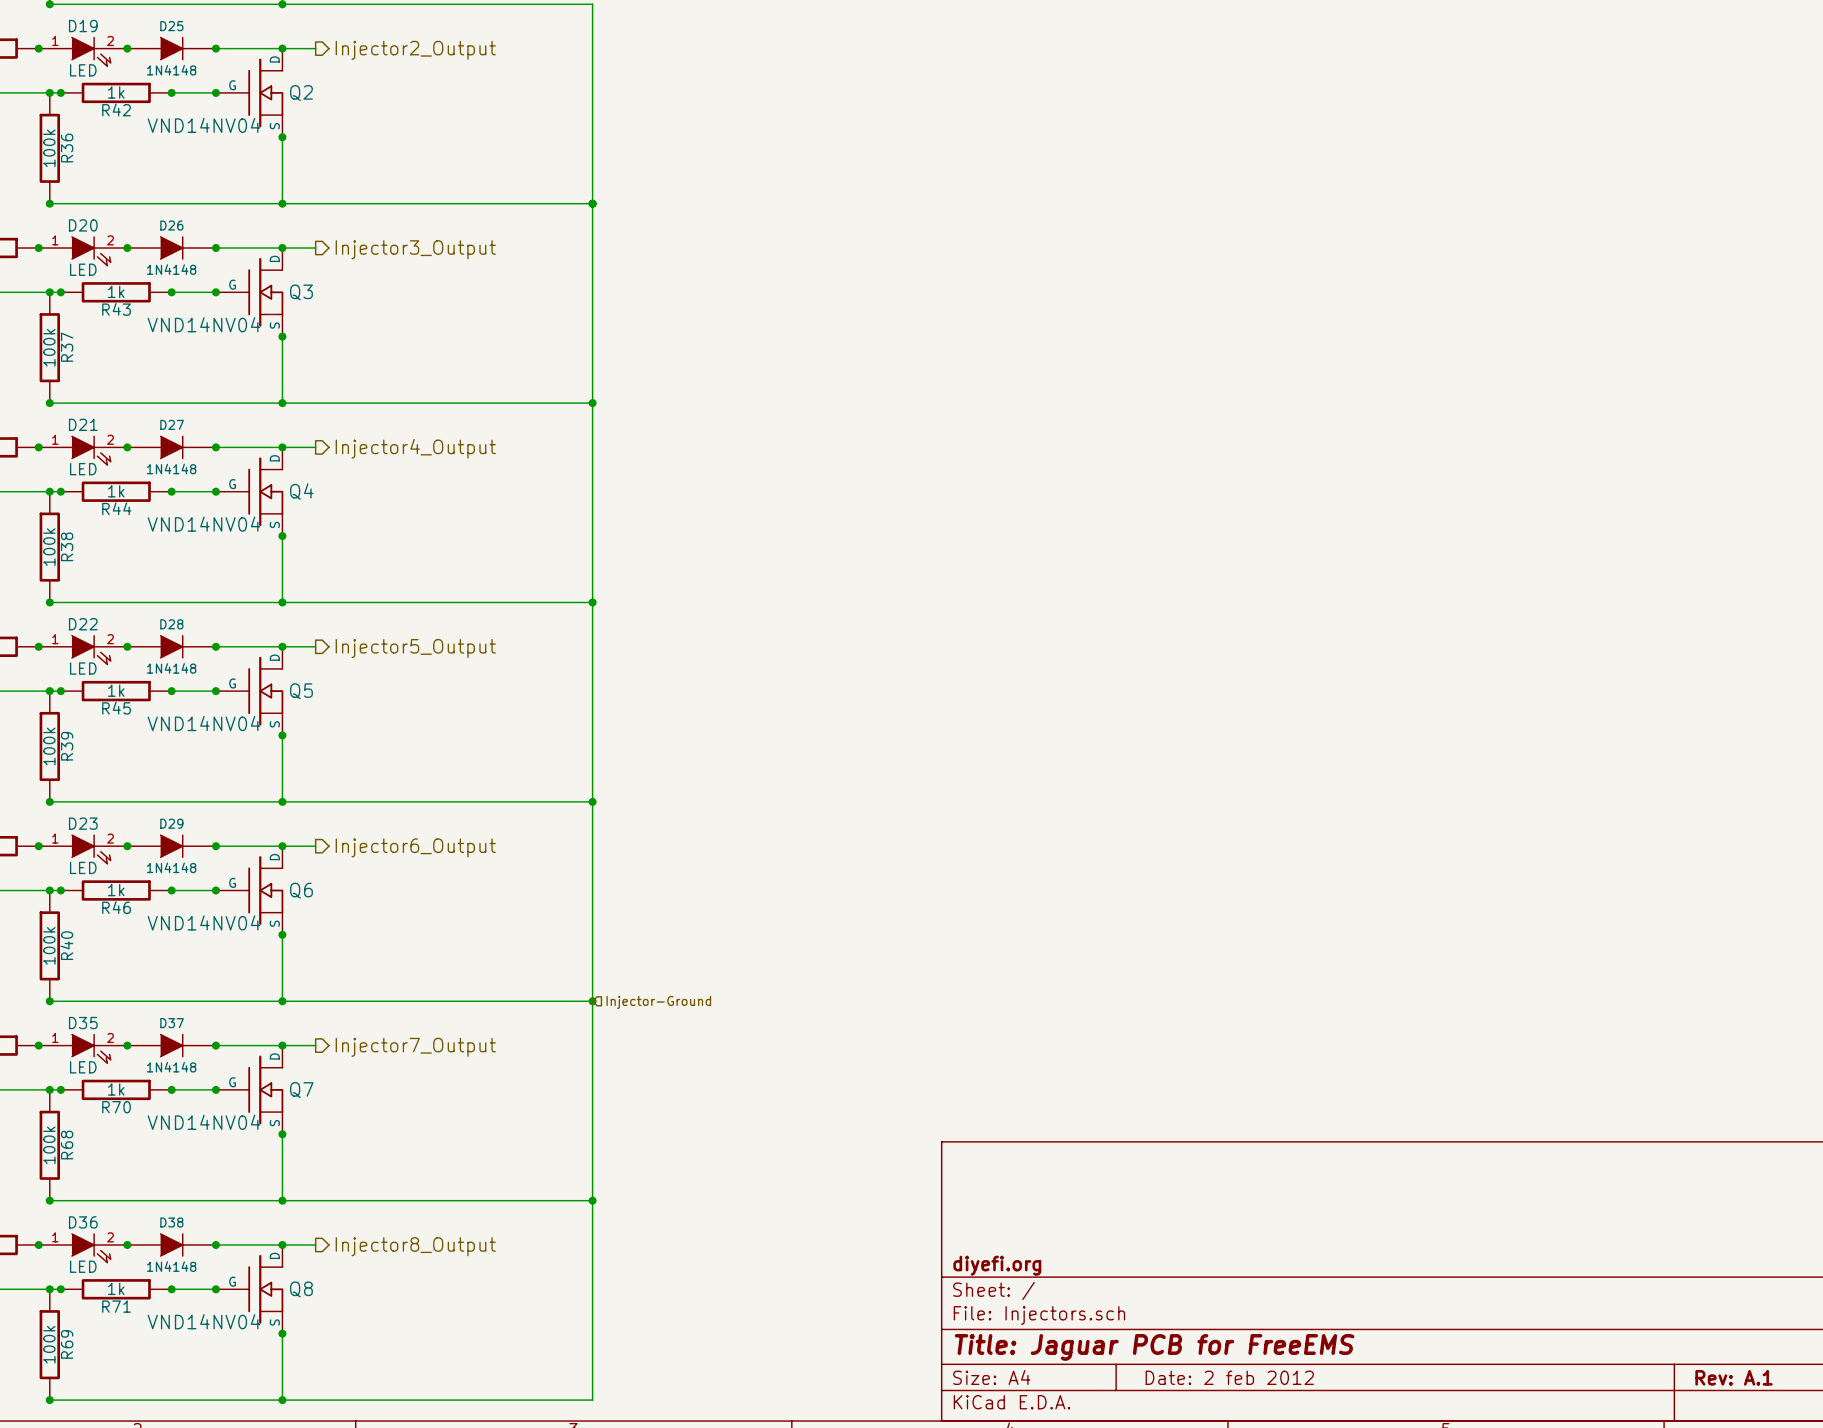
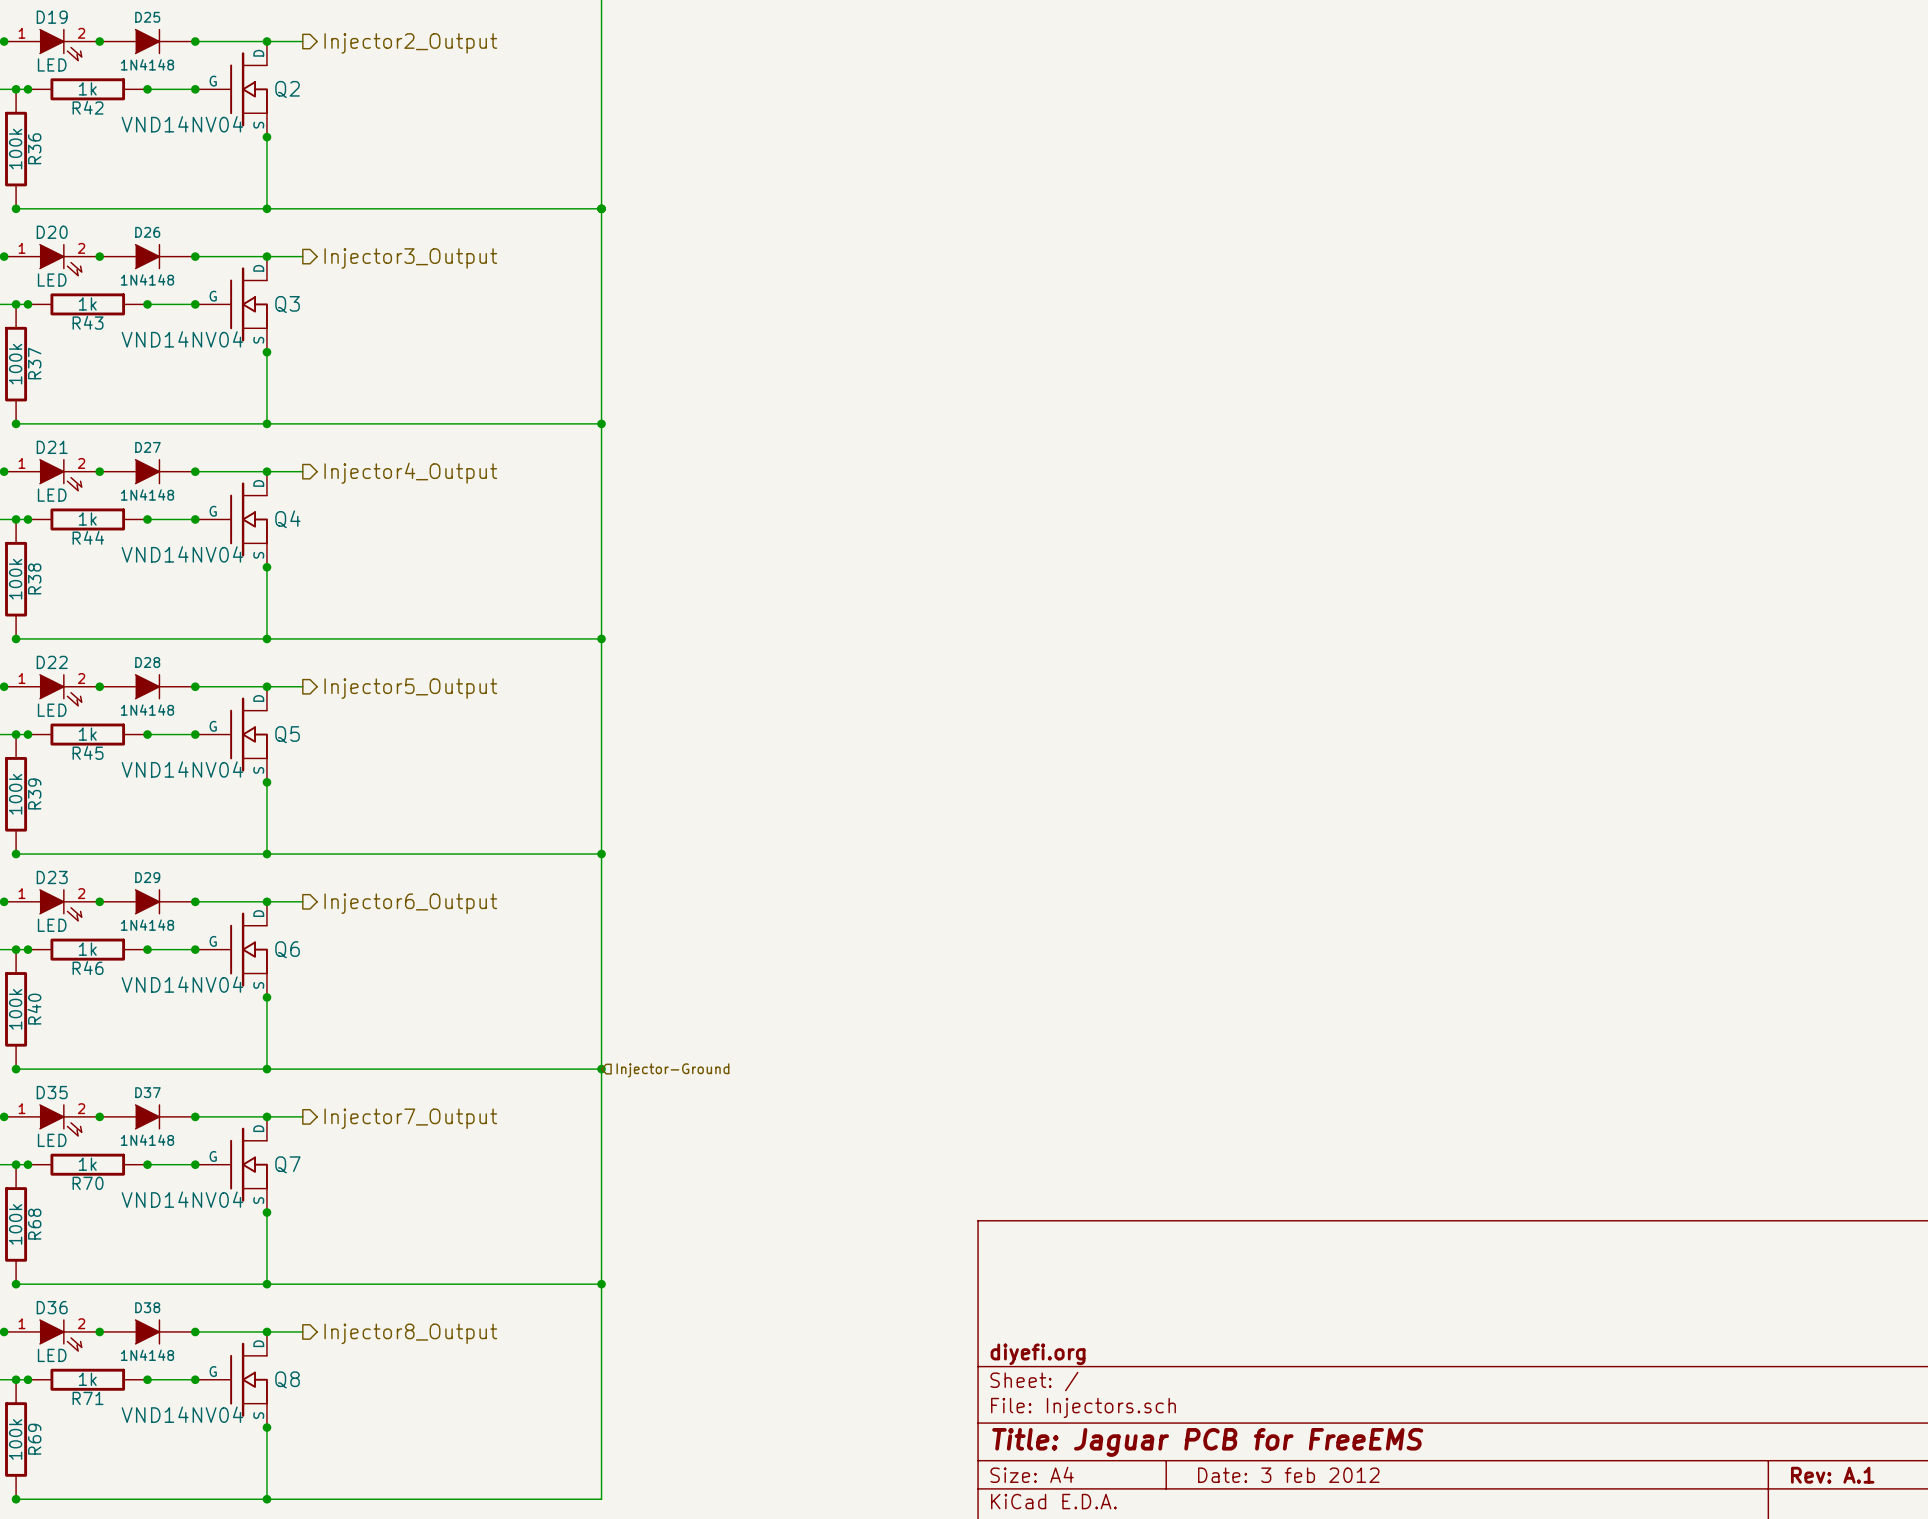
title block: Date: 2 feb 2012 (1229, 1377) -> Date: 3 feb 2012 (1288, 1475)

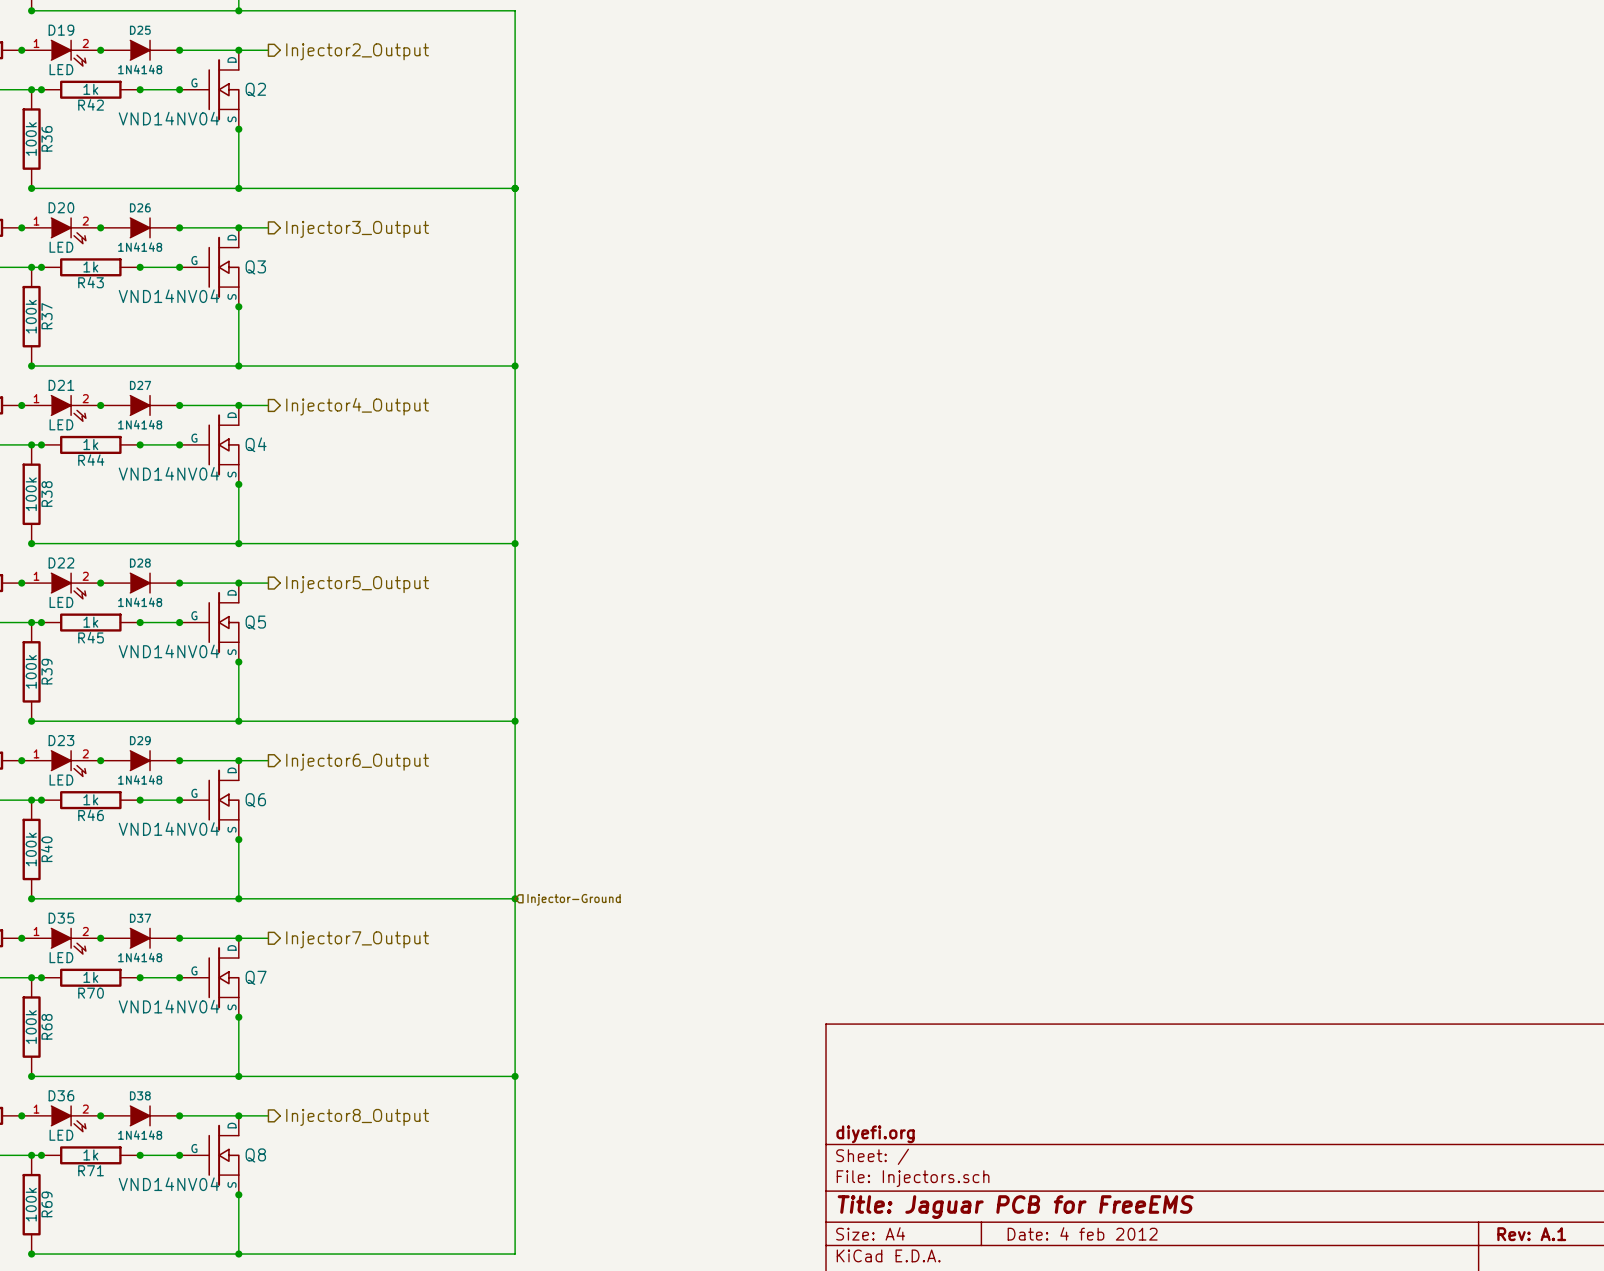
title block: Date: 3 feb 2012 (1288, 1475) -> Date: 4 feb 2012 (1082, 1233)

